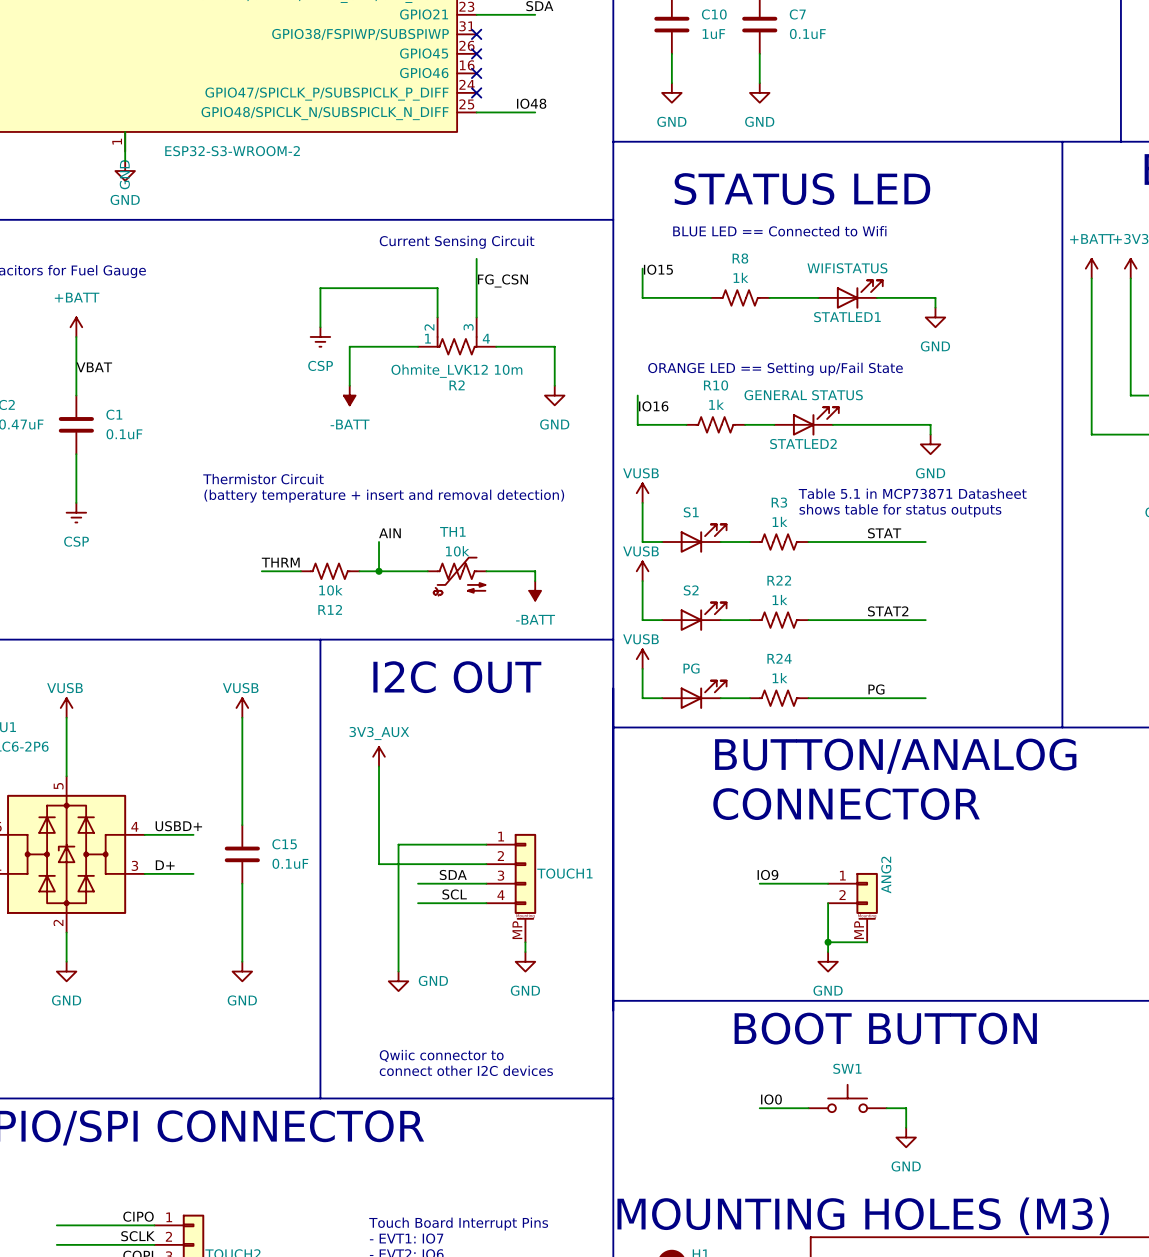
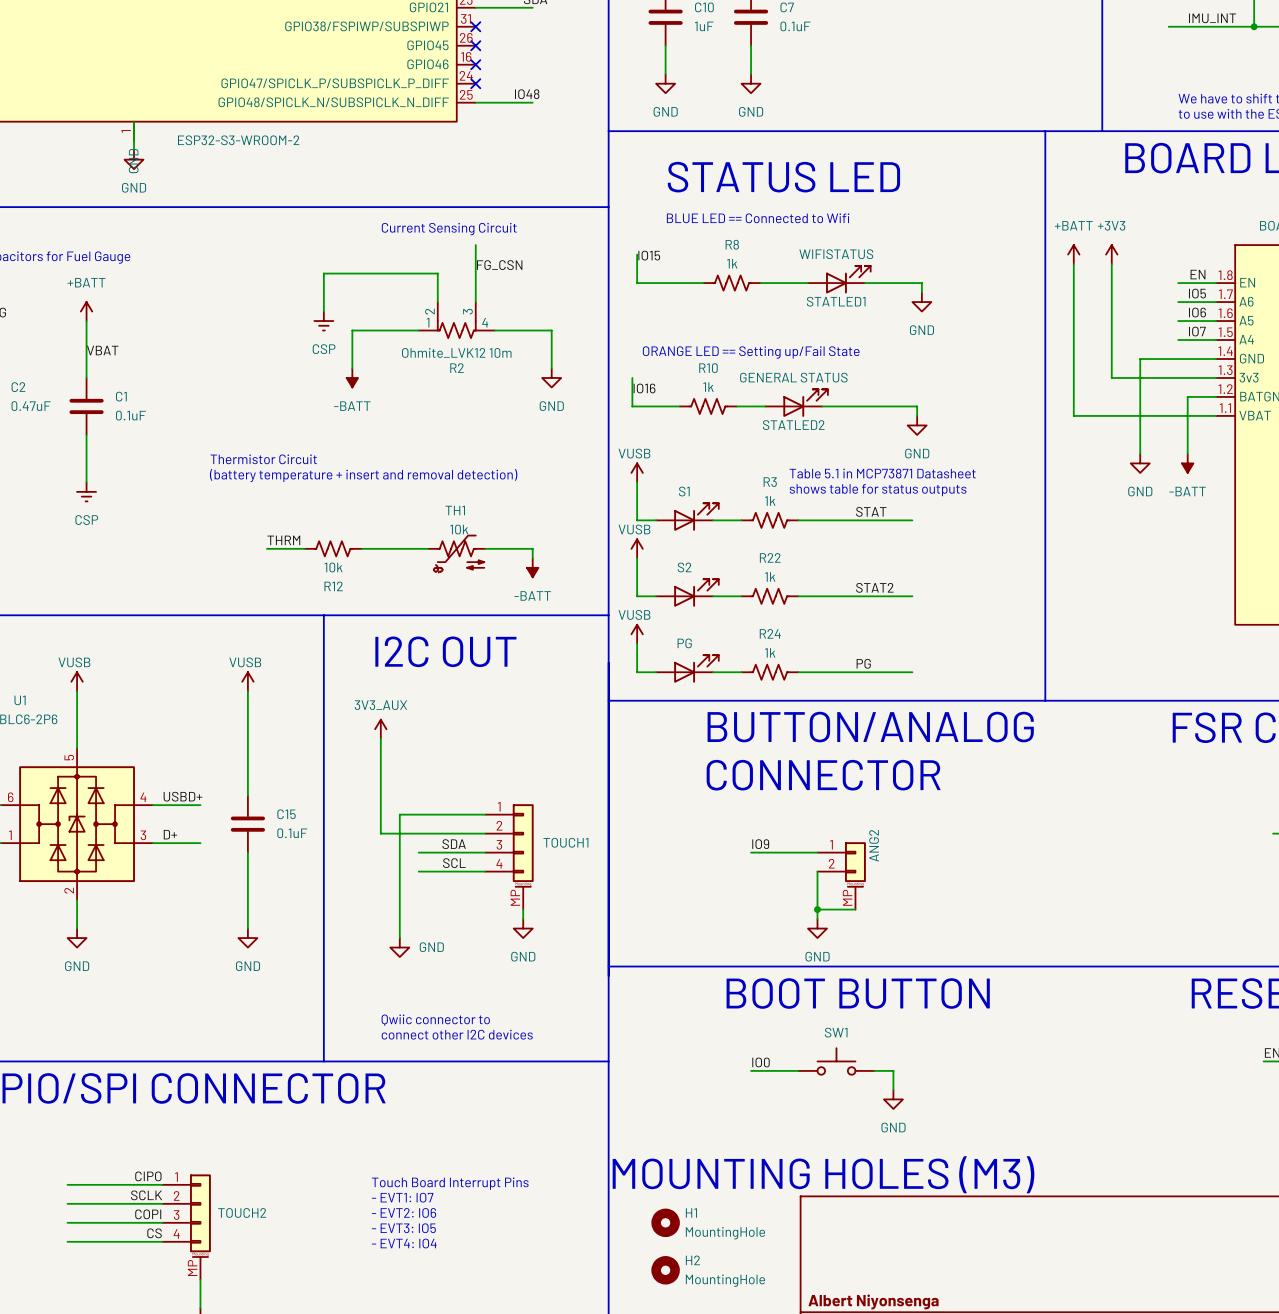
label: AIN (389, 533) -> none
wire: (379, 542) (379, 571) -> none
junction: (379, 571) -> none

